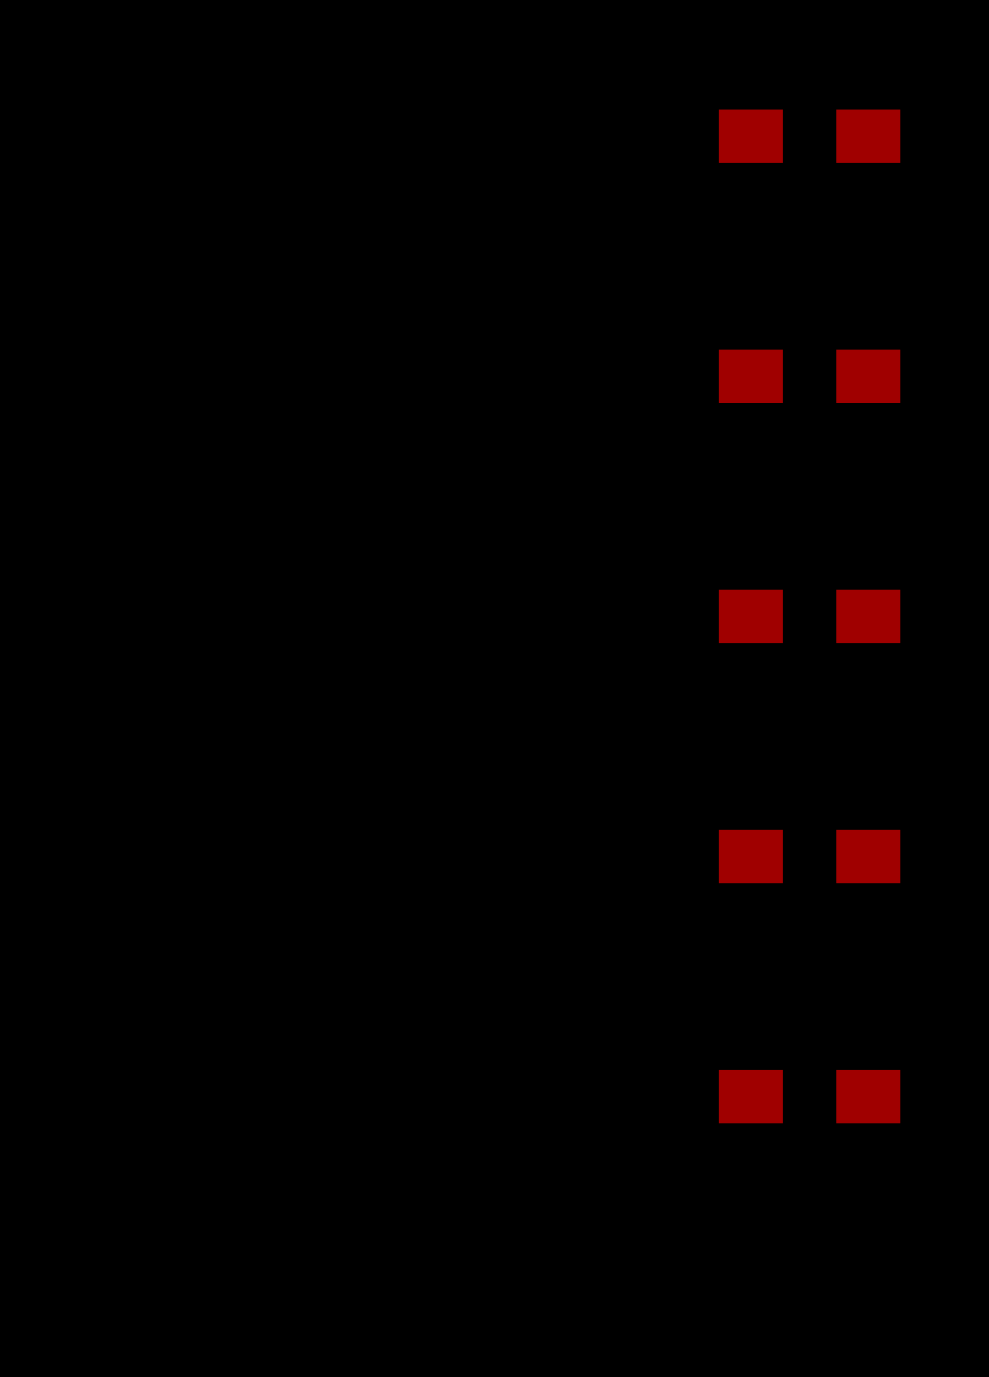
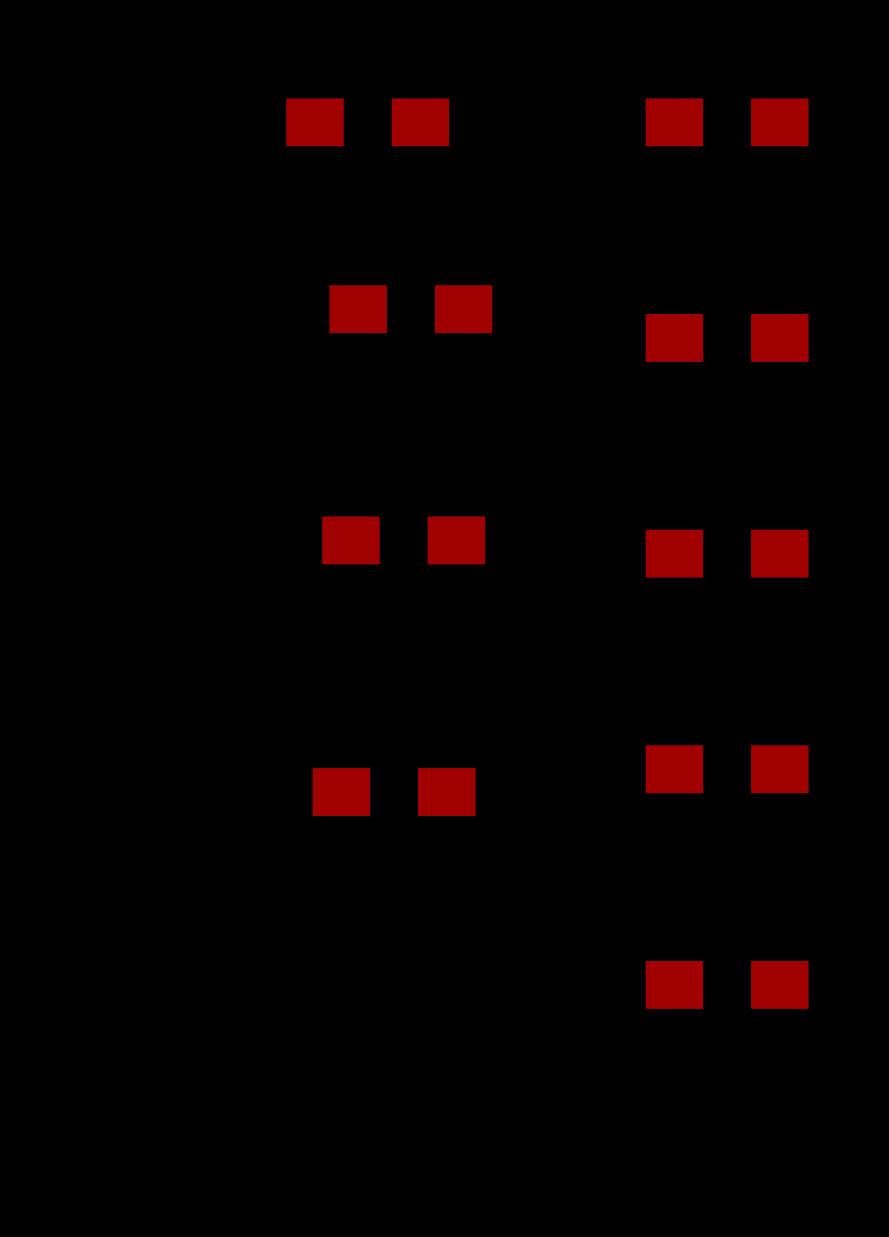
part: none -> (367, 122)
part: none -> (410, 309)
part: none -> (403, 540)
part: none -> (394, 792)

